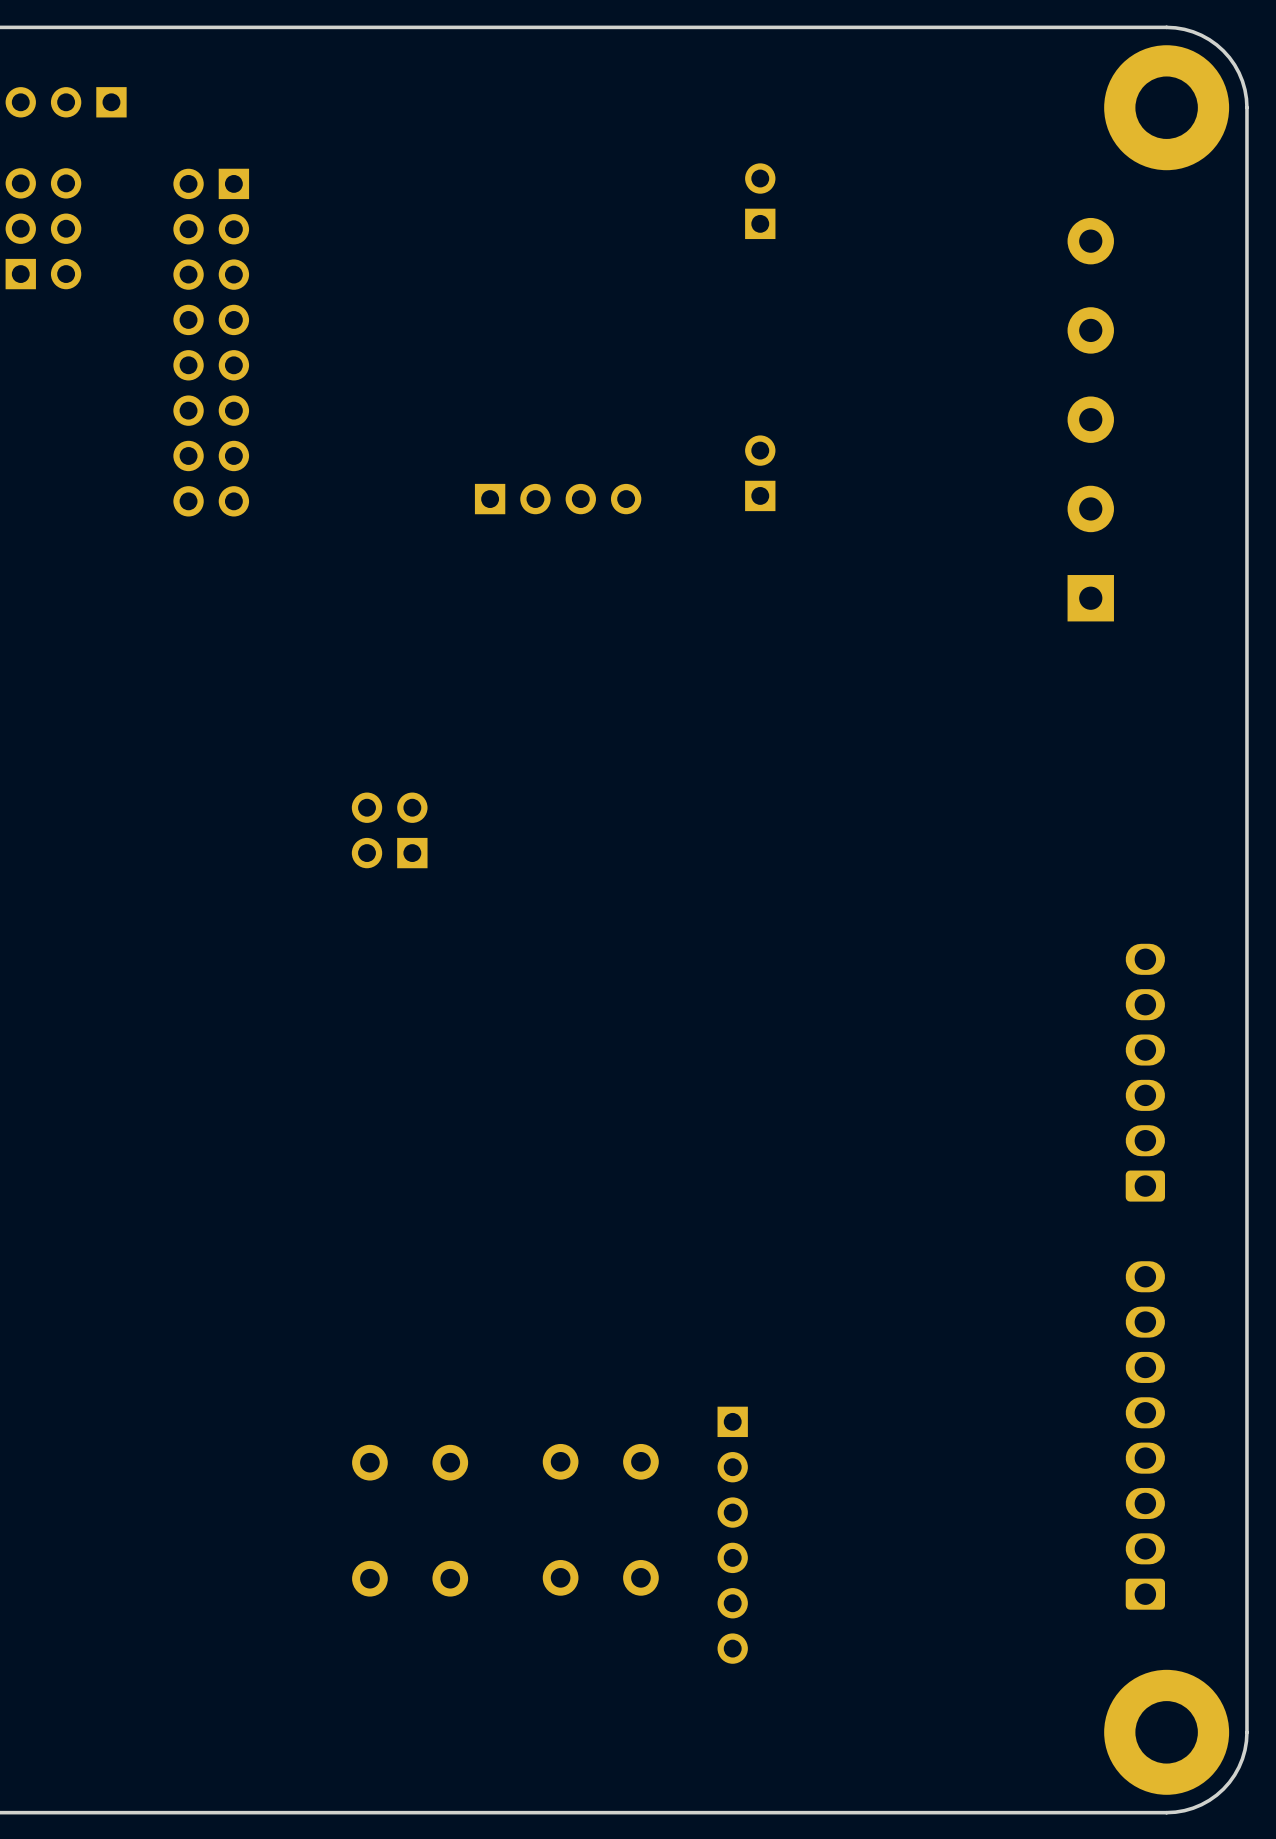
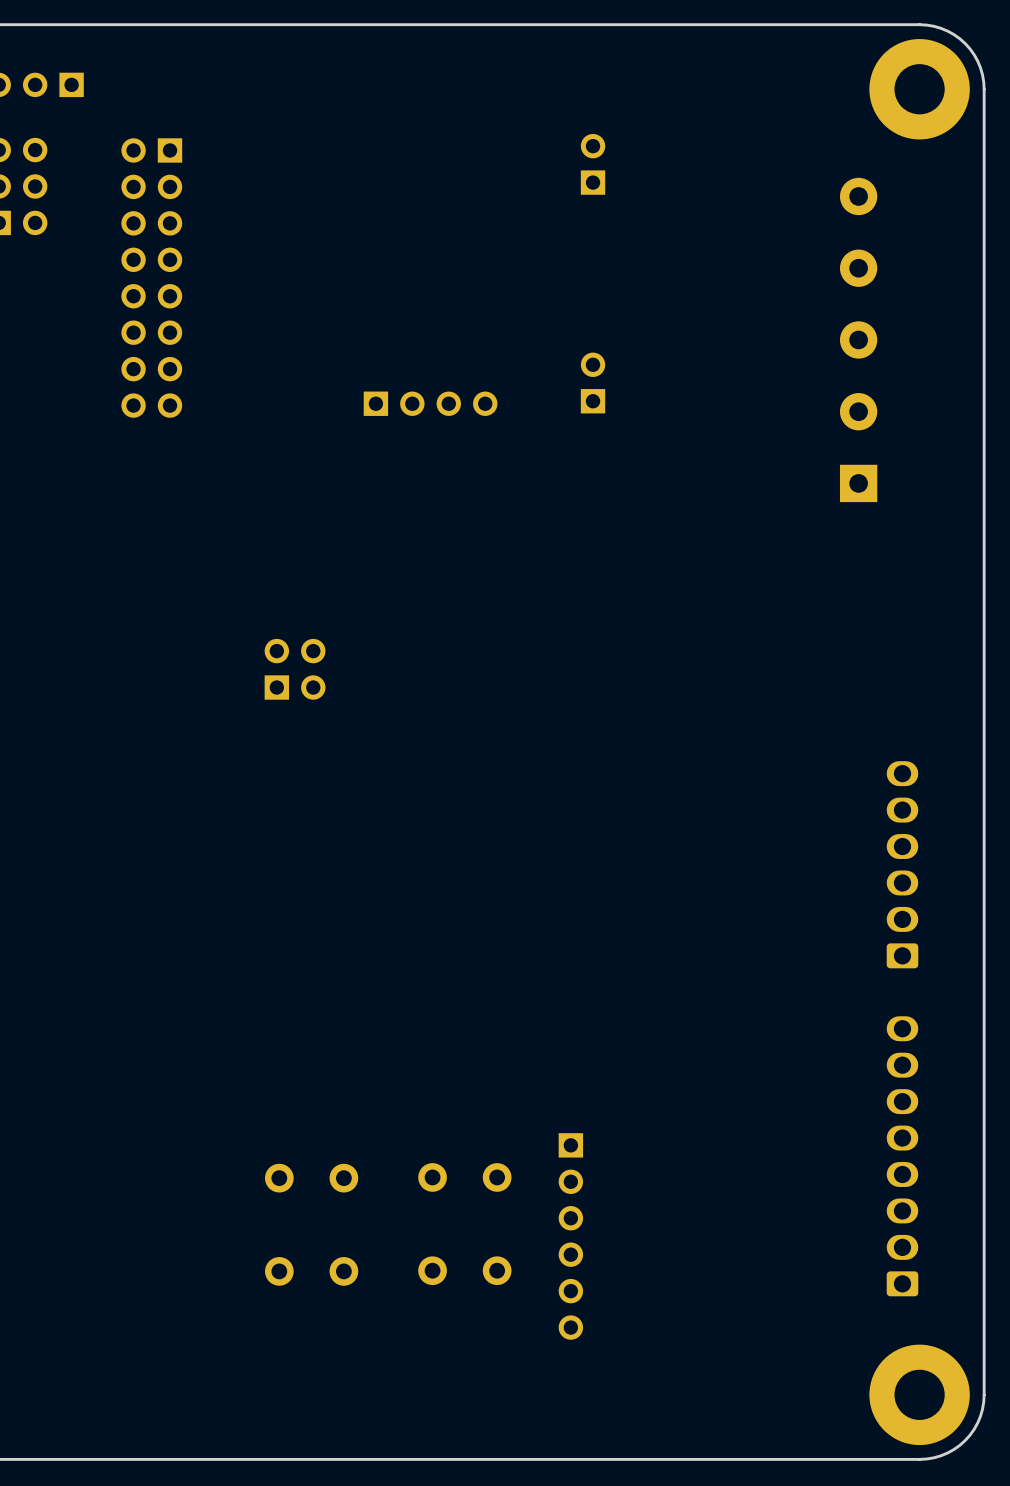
part rotation: 0° (389, 830) -> 90° clockwise (295, 669)

